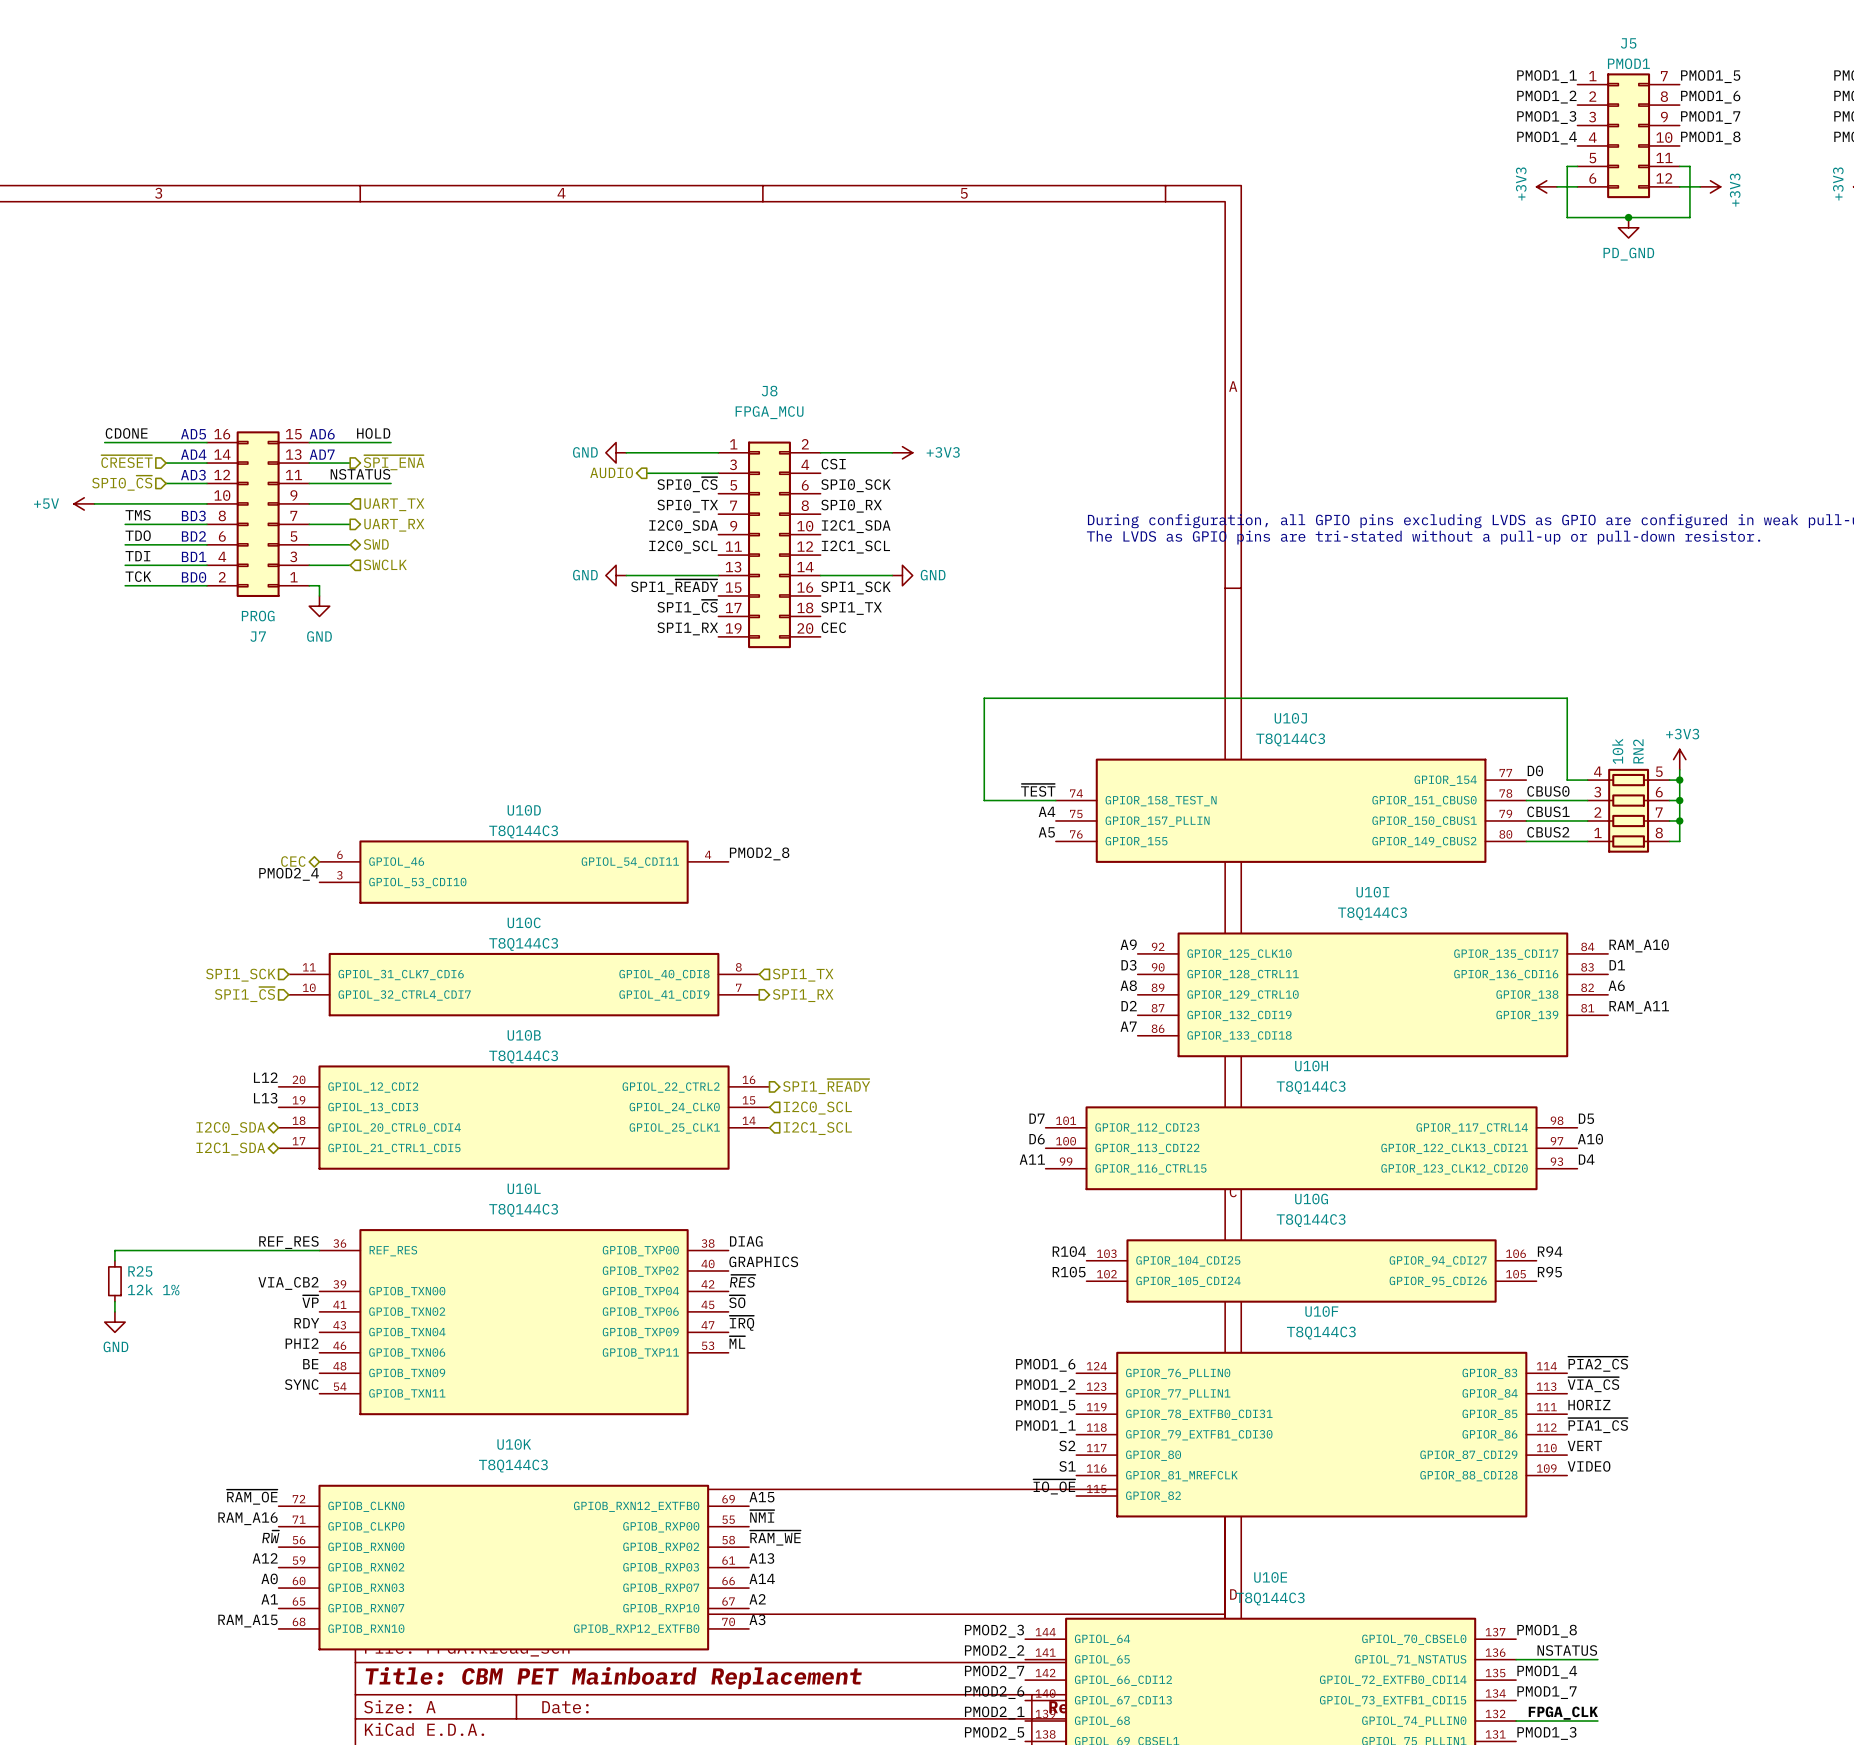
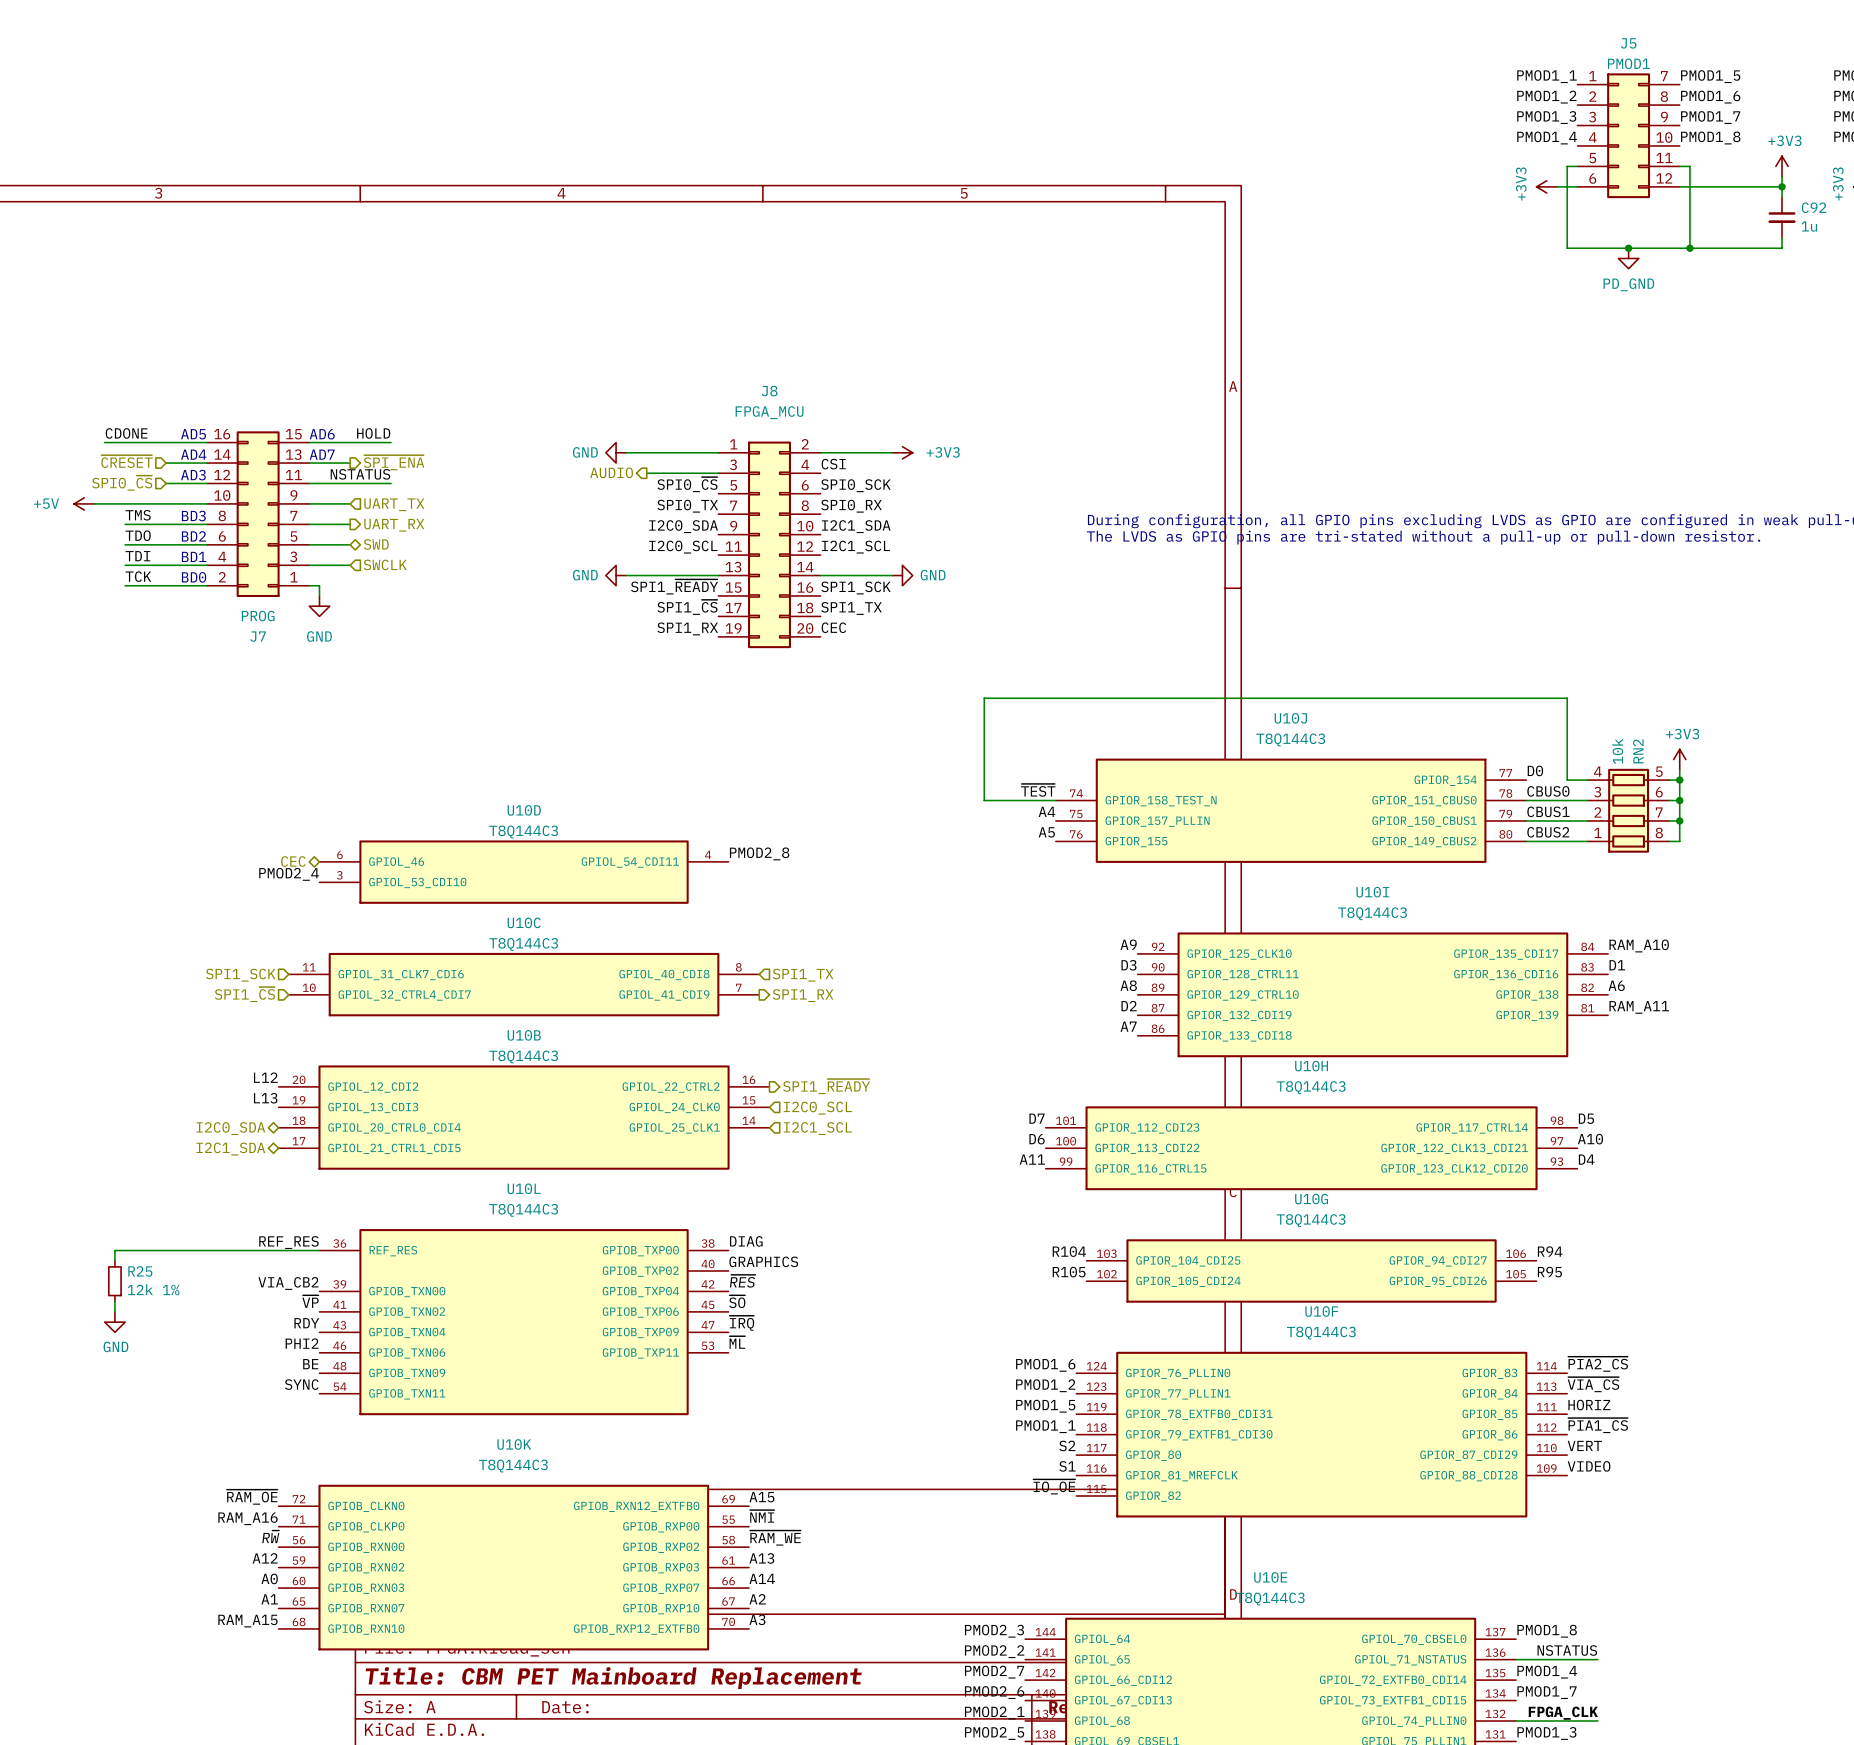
wire: none -> (1782, 176) (1782, 197)
wire: none -> (1700, 186) (1782, 186)
power symbol rotation: 0° (1710, 186) -> 90° counterclockwise (1782, 166)
power symbol position: +3V3 (1710, 186) -> +3V3 (1782, 166)
junction: none -> (1782, 186)
wire: (1567, 217) (1689, 217) -> (1567, 217) (1567, 248) (1782, 248) (1782, 238)
junction position: (1628, 217) -> (1628, 248)
wire: none -> (1689, 217) (1689, 248)
C92: none -> 1u (1782, 217)
power symbol position: PD_GND (1628, 227) -> PD_GND (1628, 258)
junction: none -> (1689, 248)

